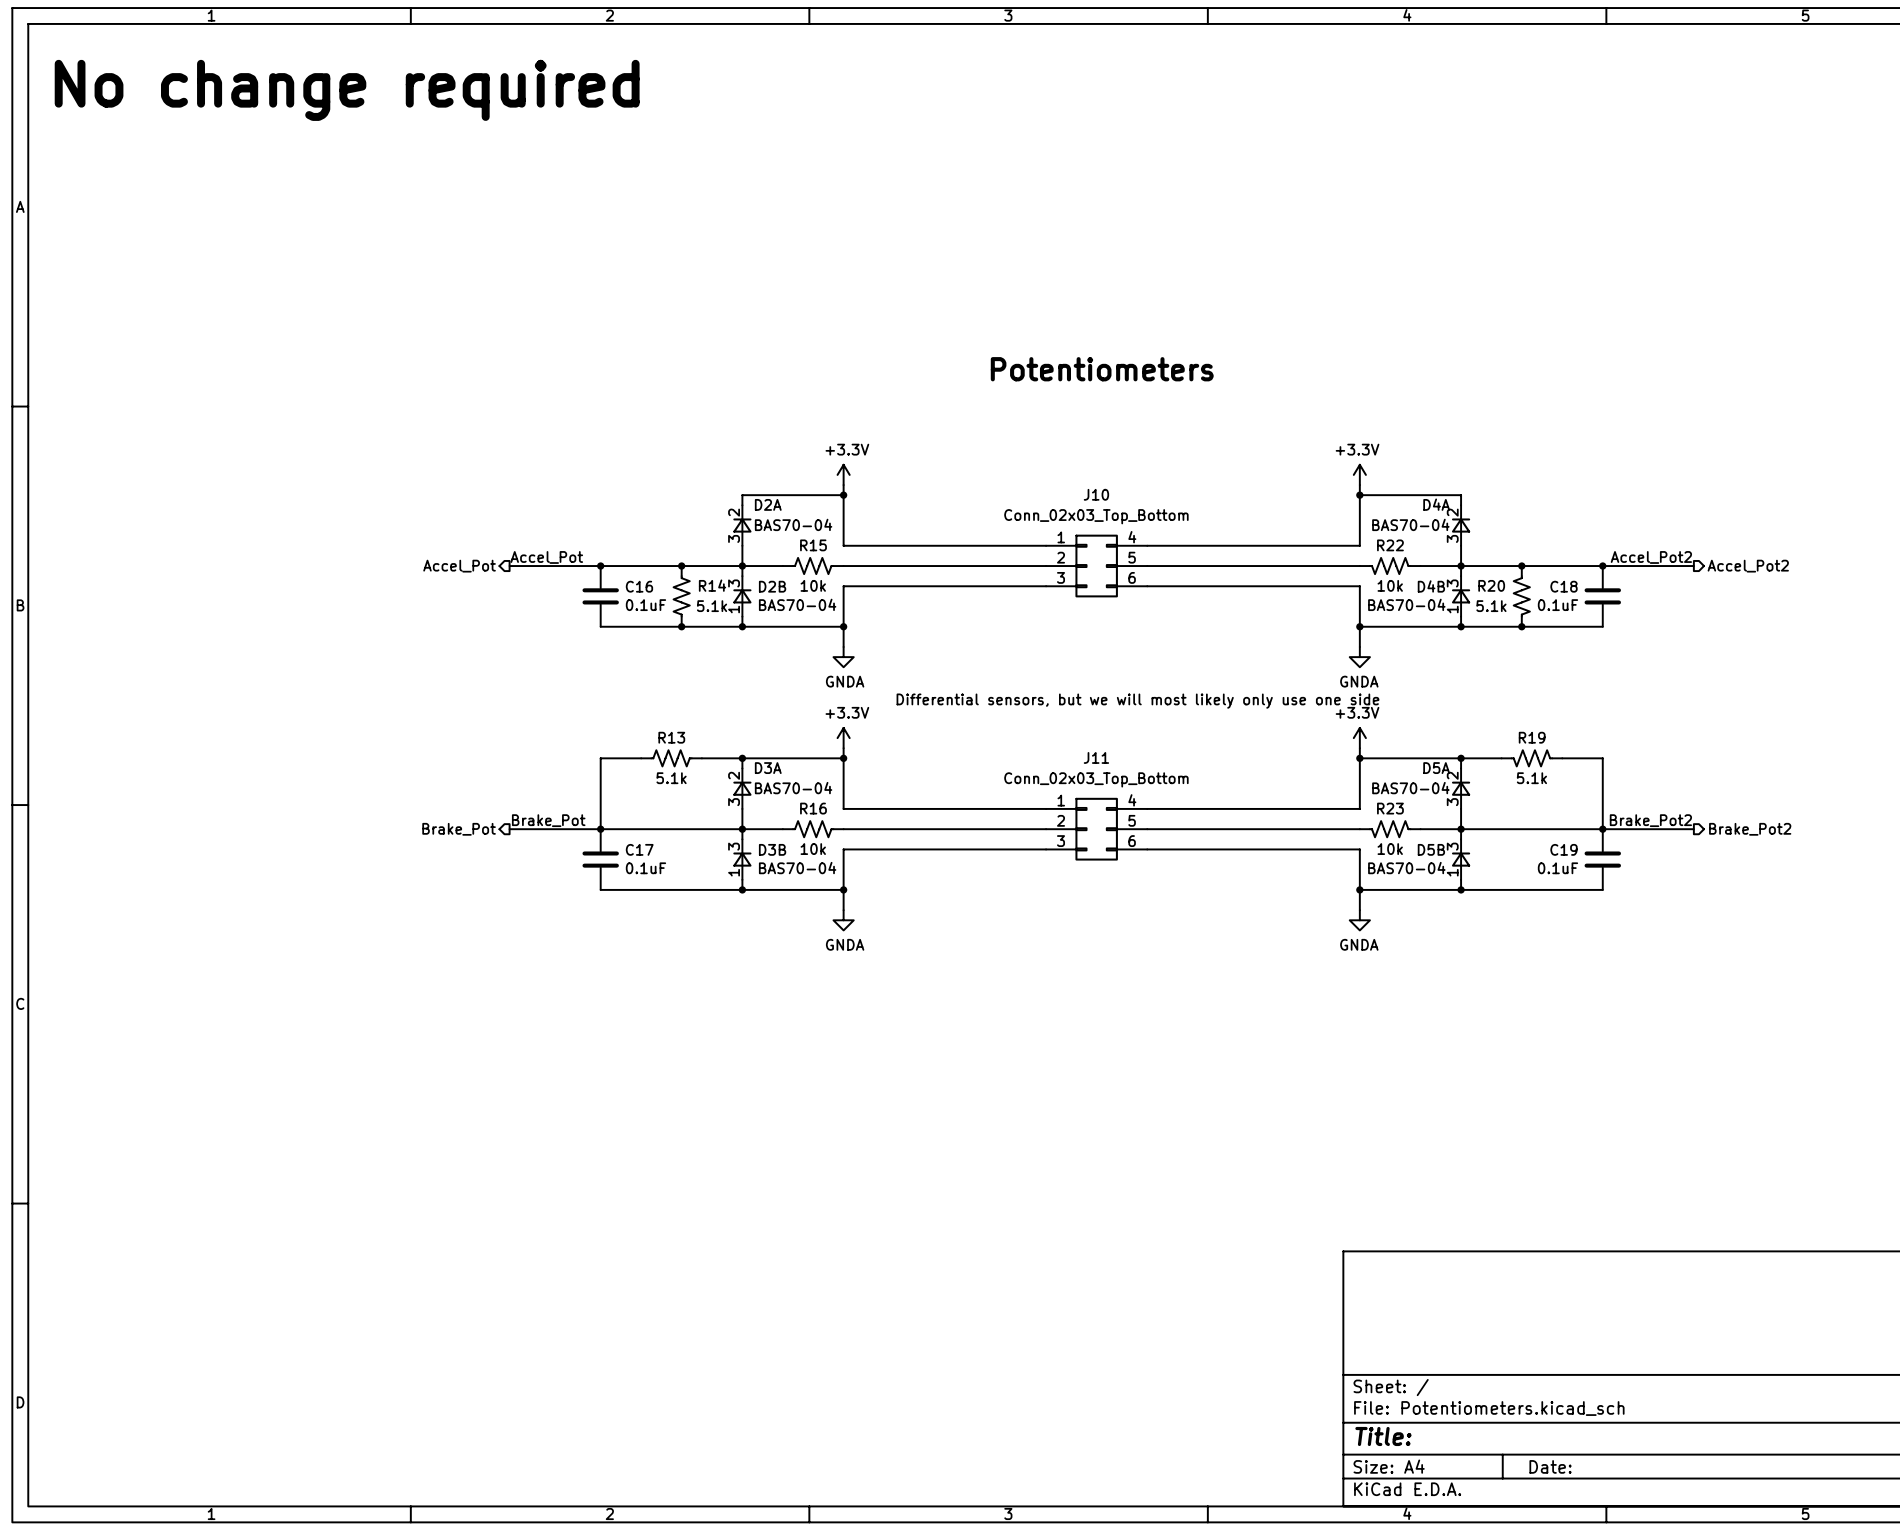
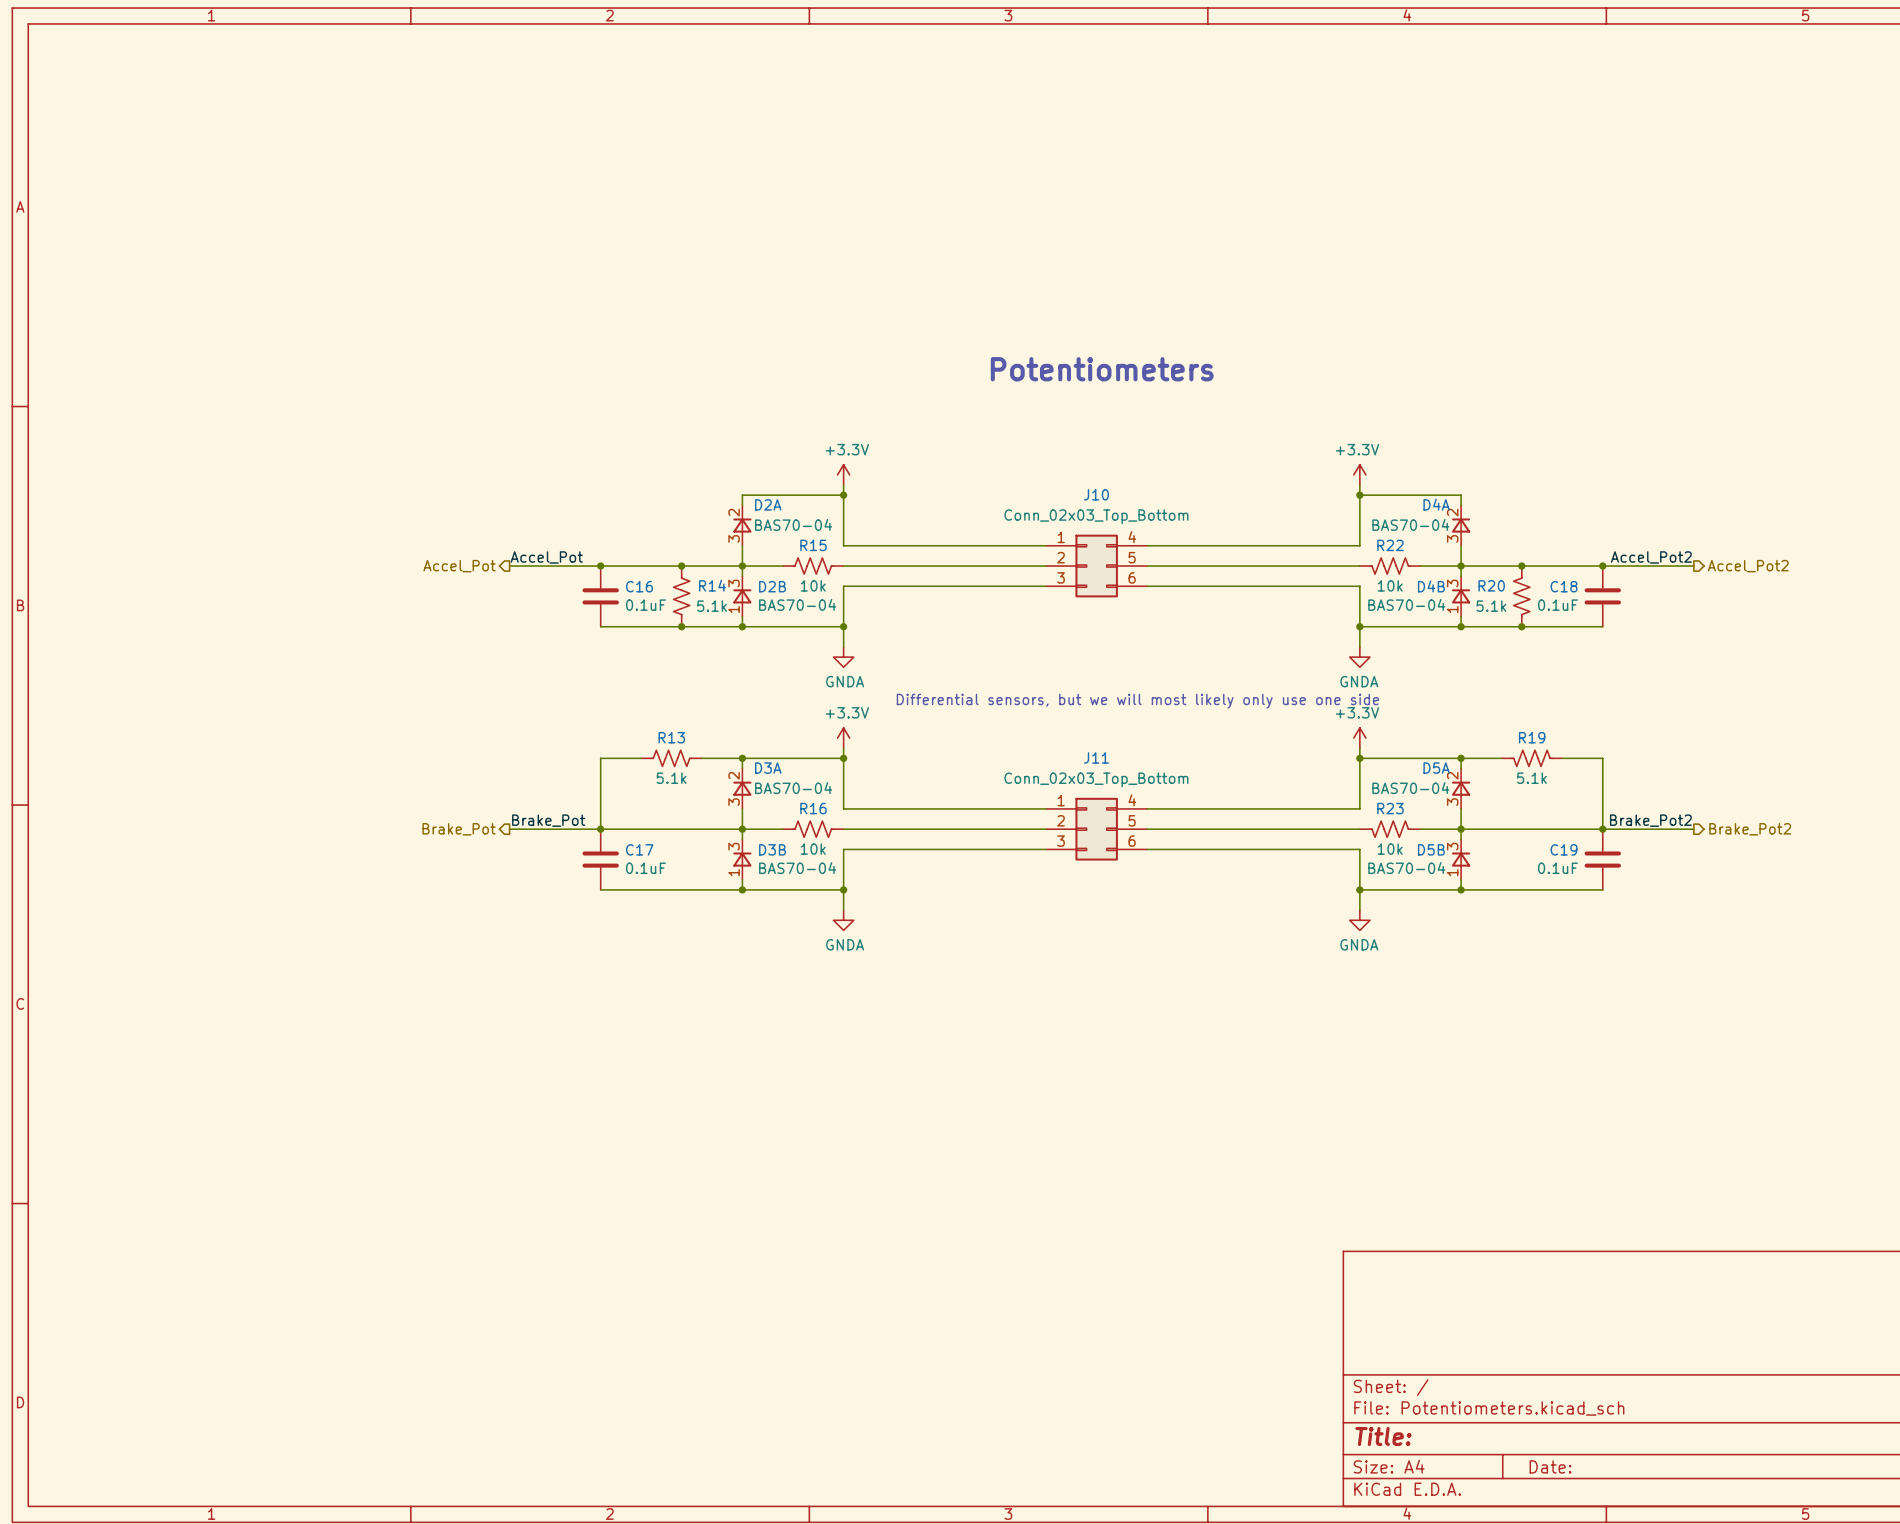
text: No change required (347, 90) -> none

